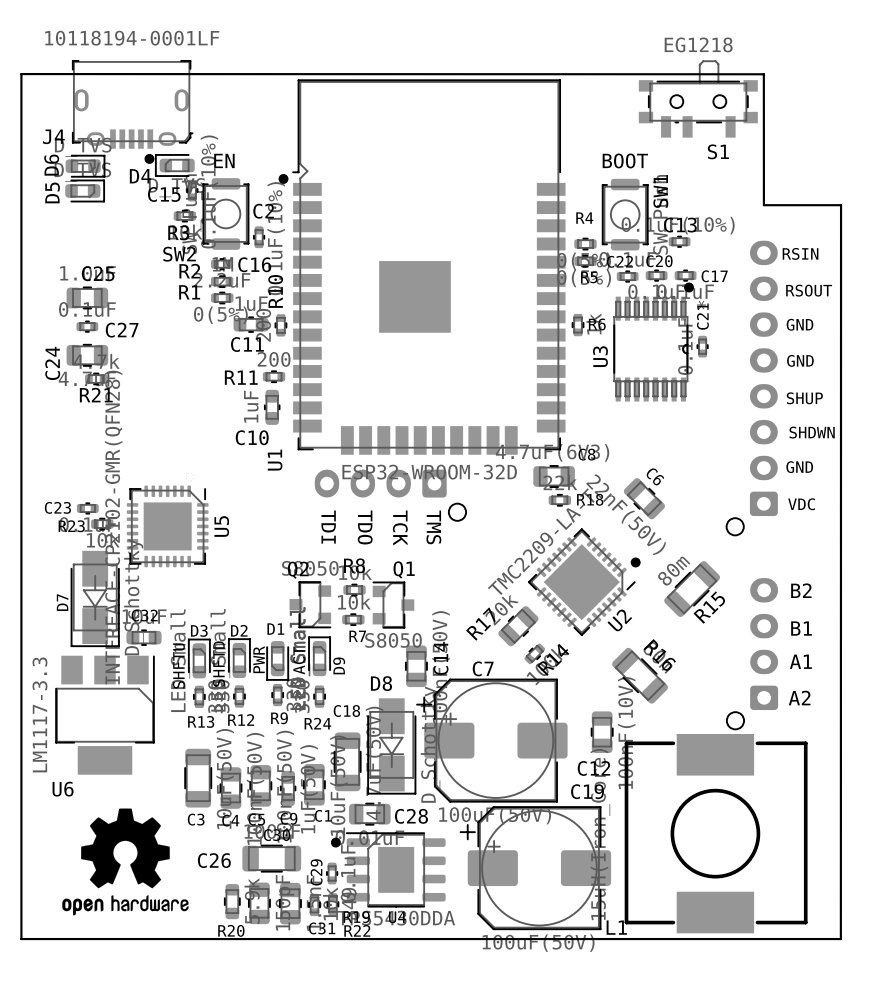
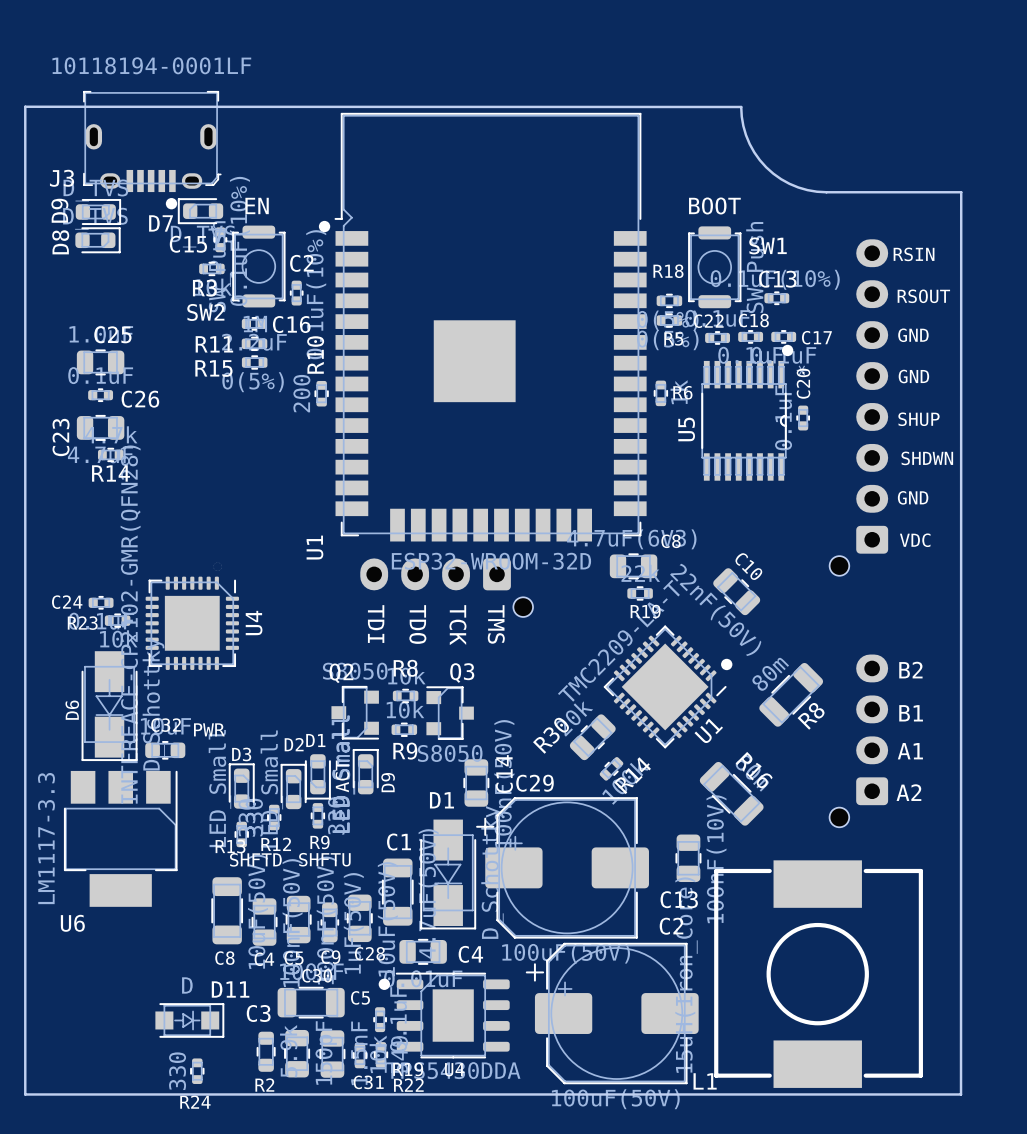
board edge: (21, 74) (763, 74) (763, 205) (841, 205) (840, 939) -> (25, 106) (741, 107) (746, 135) (759, 160) (781, 179) (798, 187) (826, 192) (961, 192) (961, 1094)
S1: EG1218 (698, 99) -> none
J4 name: J4 (53, 136) -> J3 (62, 178)
D6 name: D6 (51, 165) -> D9 (59, 210)
D4 name: D4 (140, 176) -> D7 (161, 223)
SW1 name rotation: 0° (660, 191) -> 90° clockwise (767, 245)
D5 name: D5 (52, 192) -> D8 (60, 242)
R4 name: R4 (584, 218) -> R18 (668, 271)
text position: RSIN (800, 253) -> RSIN (914, 254)
C20 name: C20 (659, 261) -> C18 (753, 320)
R2 name: R2 (189, 271) -> R11 (214, 344)
text: none -> GND (913, 335)
text position: RSOUT (809, 290) -> RSOUT (923, 296)
R1 name: R1 (189, 292) -> R15 (213, 368)
C21 name: C21 (702, 316) -> C20 (803, 383)
C11: 1uF (251, 324) -> none
text position: GND (800, 324) -> GND (913, 376)
C27 name: C27 (122, 330) -> C26 (140, 399)
U3 name: U3 (600, 356) -> U5 (686, 429)
text: GND (800, 360) -> none
C24 name: C24 (52, 363) -> C23 (61, 437)
R11: 200 (274, 376) -> none
part position: (752, 388) -> (858, 407)
R21 name: R21 (96, 395) -> R14 (110, 473)
text position: SHUP (804, 398) -> SHUP (918, 419)
C10: 1uF (272, 407) -> none
text: none -> GND (913, 497)
text position: SHDWN (812, 432) -> SHDWN (927, 458)
text: GND (799, 467) -> none
C6 name: C6 (655, 476) -> C10 (748, 566)
R18 name: R18 (590, 499) -> R19 (645, 611)
text position: VDC (801, 504) -> VDC (915, 540)
C23 name: C23 (57, 507) -> C24 (67, 602)
U5 name: U5 (221, 526) -> U4 (254, 623)
Q1 name: Q1 (404, 569) -> Q3 (462, 673)
text position: B2 (801, 590) -> B2 (910, 670)
D7 name: D7 (62, 602) -> D6 (72, 710)
R15 name: R15 (709, 607) -> R8 (811, 716)
U2 name: U2 (619, 620) -> U1 (708, 730)
R17 name: R17 (480, 624) -> R30 (551, 735)
text position: B1 (801, 628) -> B1 (911, 713)
D2 name position: D2 (239, 630) -> D2 (294, 744)
R7 name: R7 (357, 636) -> R9 (405, 751)
part position: (752, 653) -> (858, 740)
D3 position: (199, 658) -> (241, 786)
D2 position: (239, 658) -> (293, 786)
text rotation: 0° (259, 659) -> 90° clockwise (209, 729)
text position: PWR (259, 659) -> PWR (209, 729)
text position: A1 (800, 661) -> A1 (910, 751)
text rotation: 0° (218, 664) -> 90° clockwise (255, 859)
text position: SHFTD (218, 664) -> SHFTD (255, 859)
text rotation: 0° (178, 665) -> 90° clockwise (324, 859)
text position: SHFTU (178, 665) -> SHFTU (324, 859)
C7 name: C7 (483, 668) -> C29 (534, 783)
D8 name: D8 (381, 683) -> D1 (441, 800)
R13 position: (199, 696) -> (241, 834)
R24 position: (319, 696) -> (197, 1071)
text position: A2 (799, 698) -> A2 (908, 792)
C18 name: C18 (346, 711) -> C1 (399, 842)
C12 name: C12 (594, 768) -> C13 (679, 899)
C19 name: C19 (587, 791) -> C2 (671, 926)
drawing: [62, 808, 189, 916] -> none
C1 name: C1 (323, 815) -> C28 (369, 953)
C28 name: C28 (411, 816) -> C4 (470, 954)
C3 name: C3 (196, 819) -> C8 (224, 958)
C26 name: C26 (214, 860) -> C3 (258, 1013)
C29 name: C29 (316, 872) -> C5 (360, 997)
D11: none -> D (189, 1020)
R20 name: R20 (231, 930) -> R2 (264, 1085)

